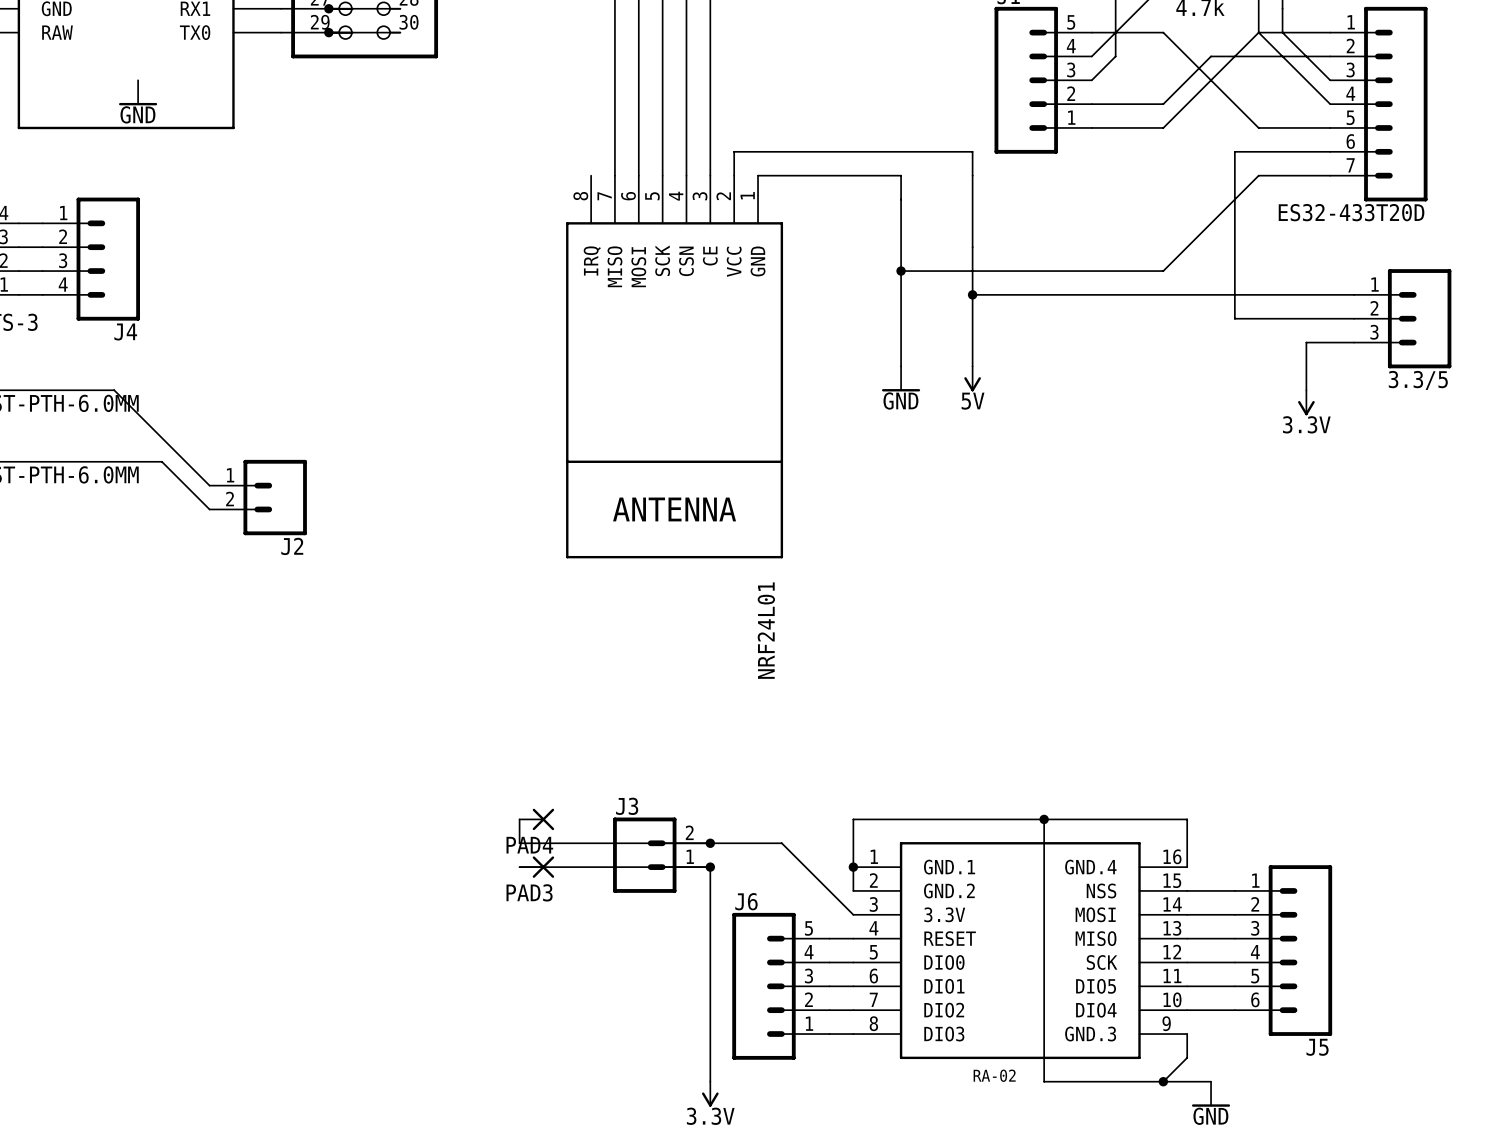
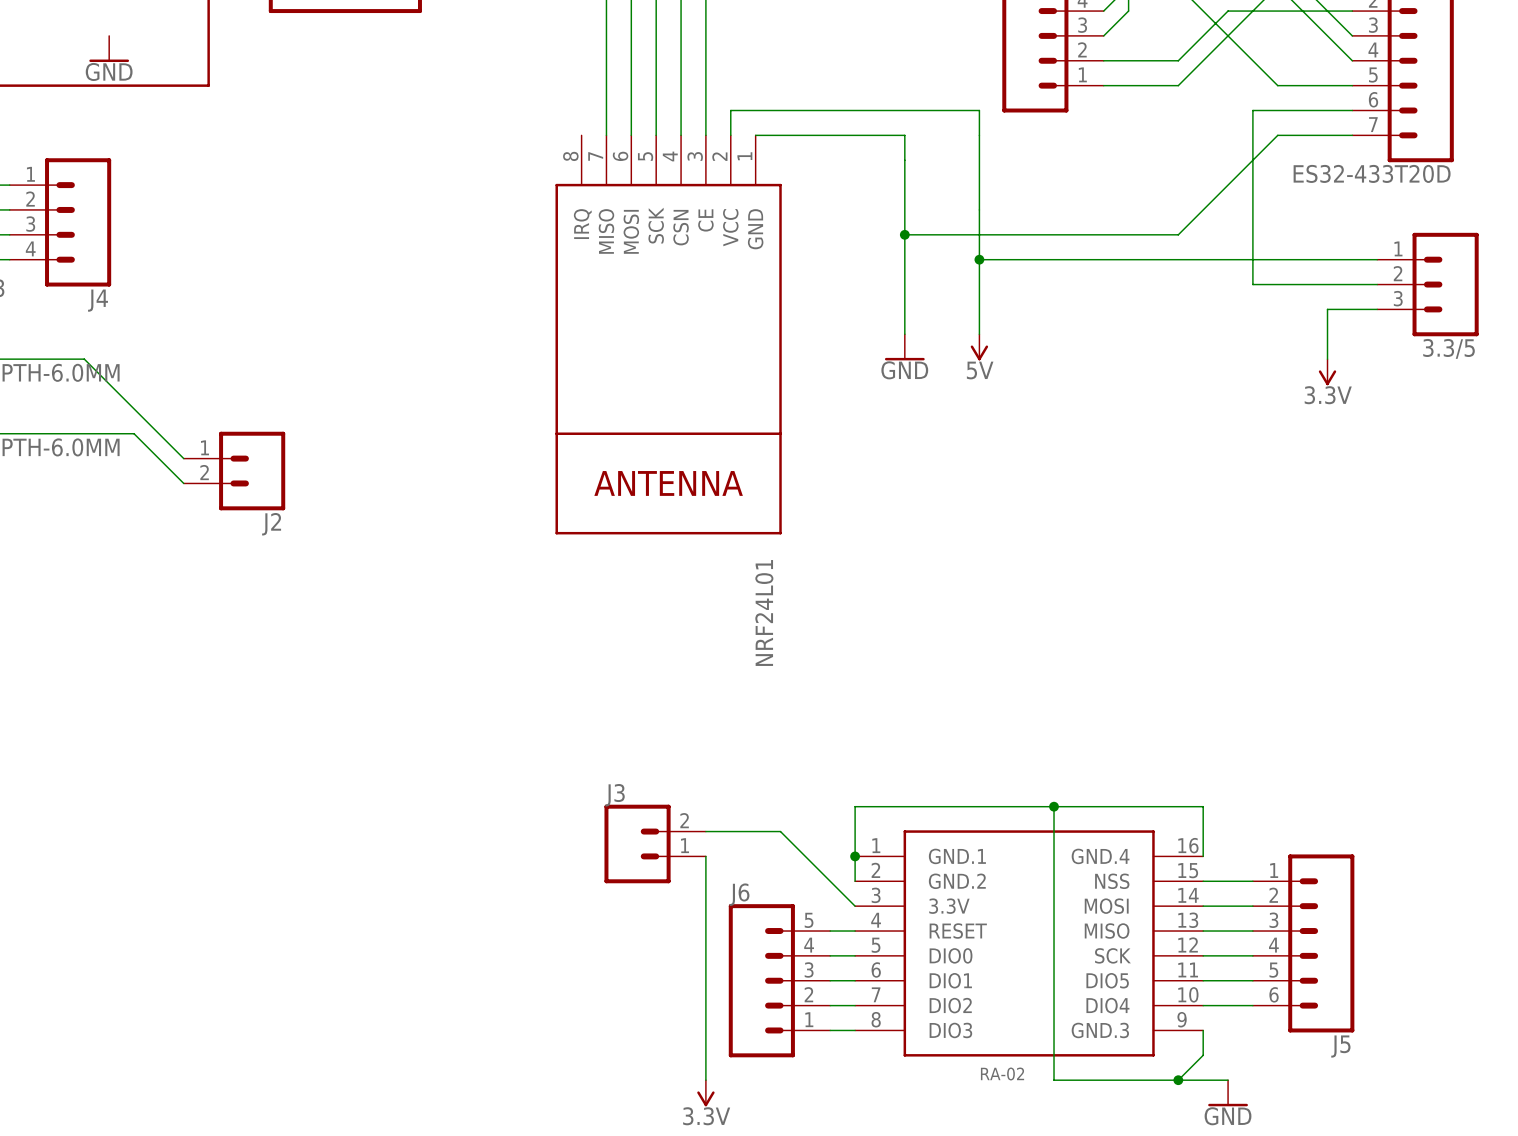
wire: (519, 819) (519, 843) (710, 843) -> none
PAD4: (536, 819) -> none
junction: (710, 843) -> none
wire: (519, 867) (710, 867) -> none
PAD3: (536, 867) -> none
junction: (710, 867) -> none

